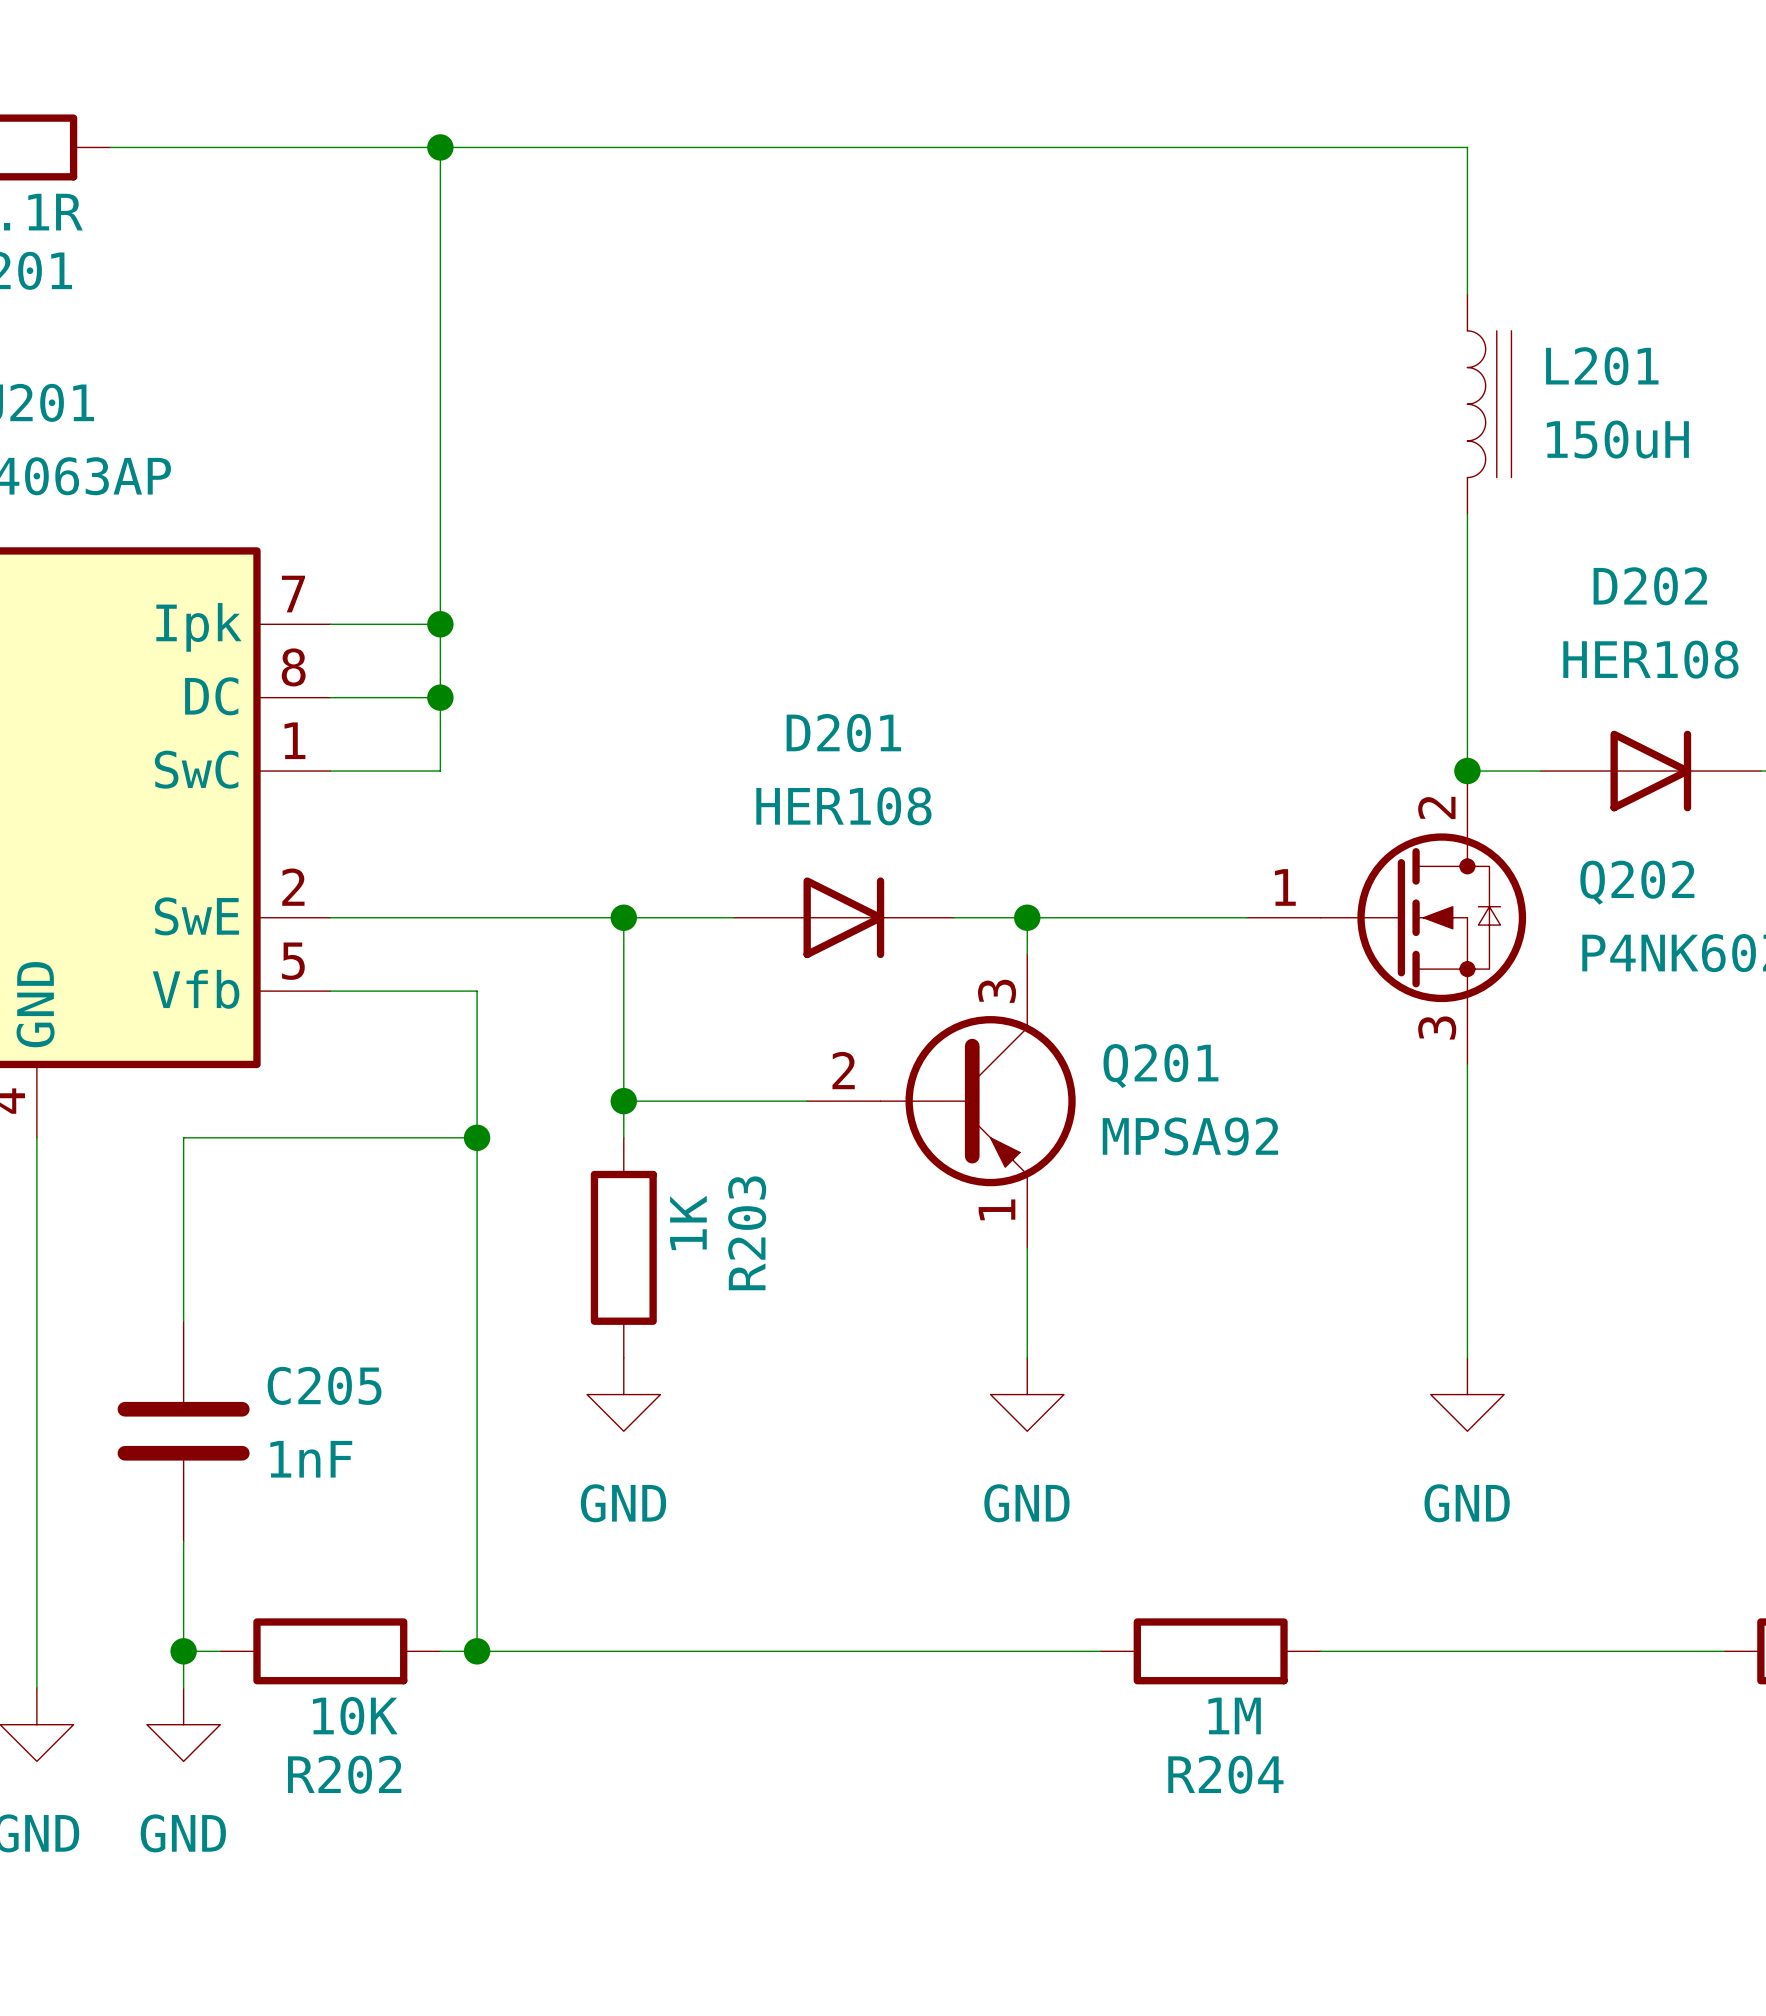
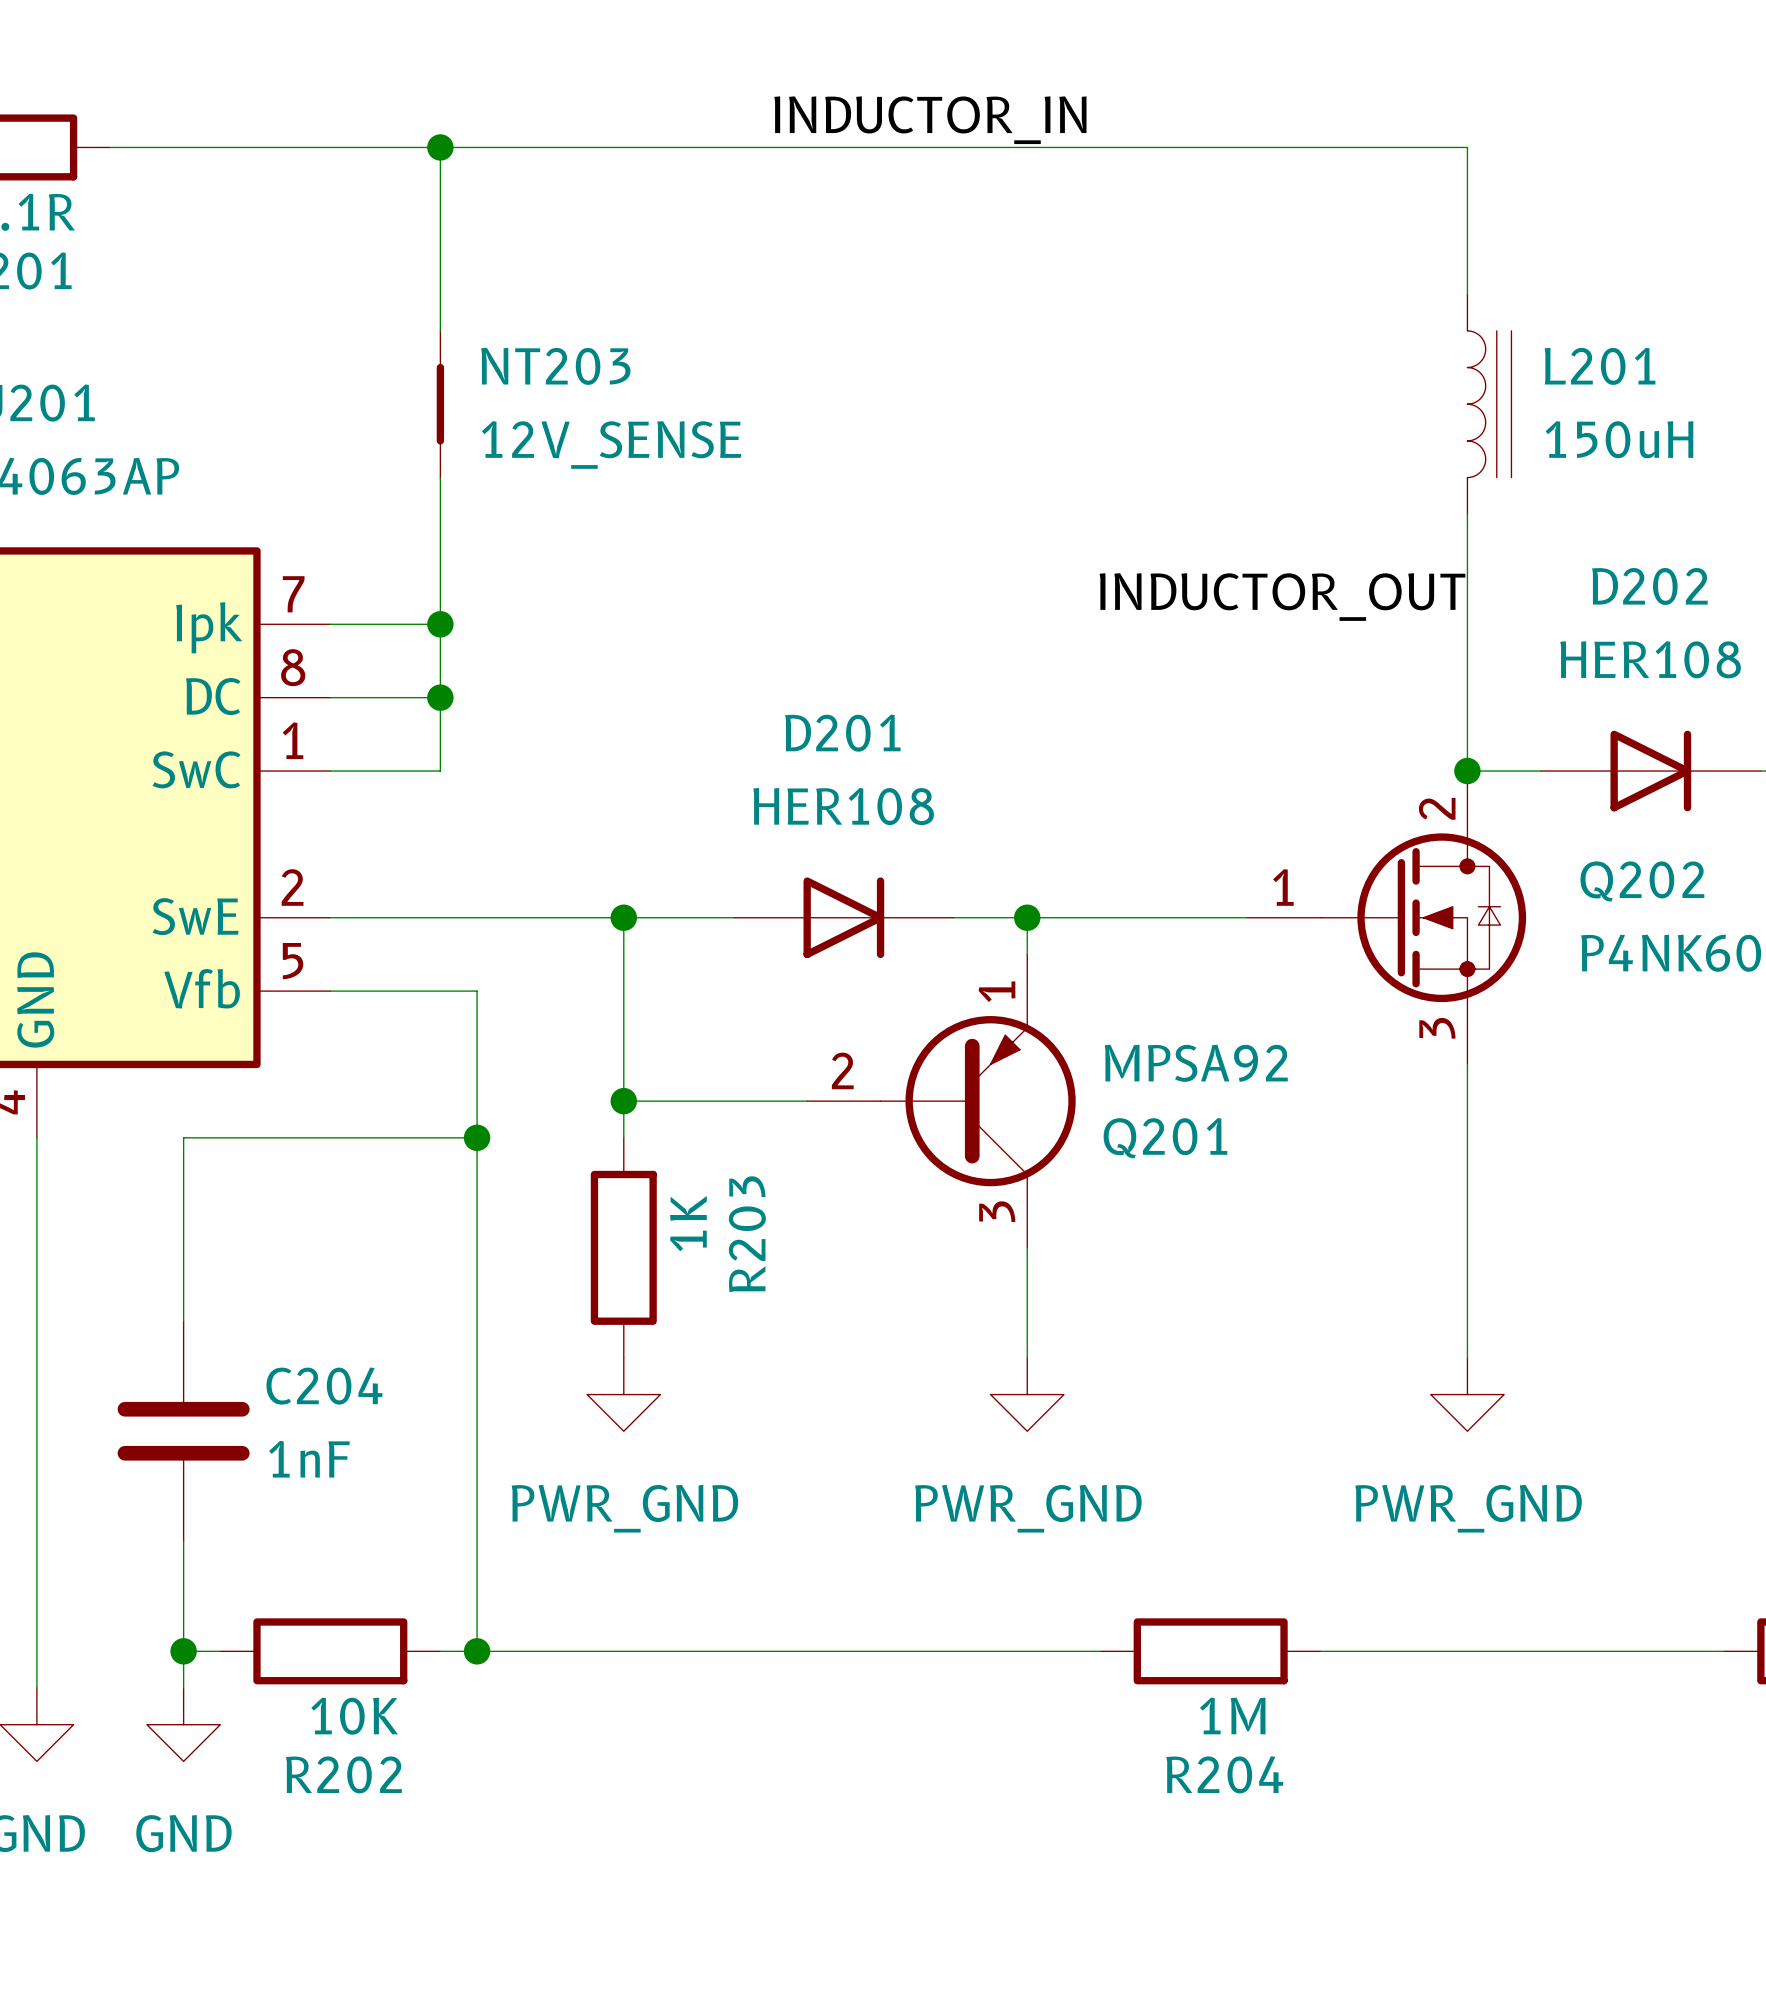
label: none -> INDUCTOR_IN (930, 120)
NT203: none -> 12V_SENSE (440, 404)
label: none -> INDUCTOR_OUT (1282, 597)
Q201 flip: as is (978, 1101) -> up-down (978, 1101)
C205 name: C205 (324, 1385) -> C204 (324, 1386)
power symbol: GND (623, 1394) -> PWR_GND (623, 1394)
power symbol: GND (1027, 1394) -> PWR_GND (1027, 1394)
power symbol: GND (1467, 1394) -> PWR_GND (1467, 1394)

